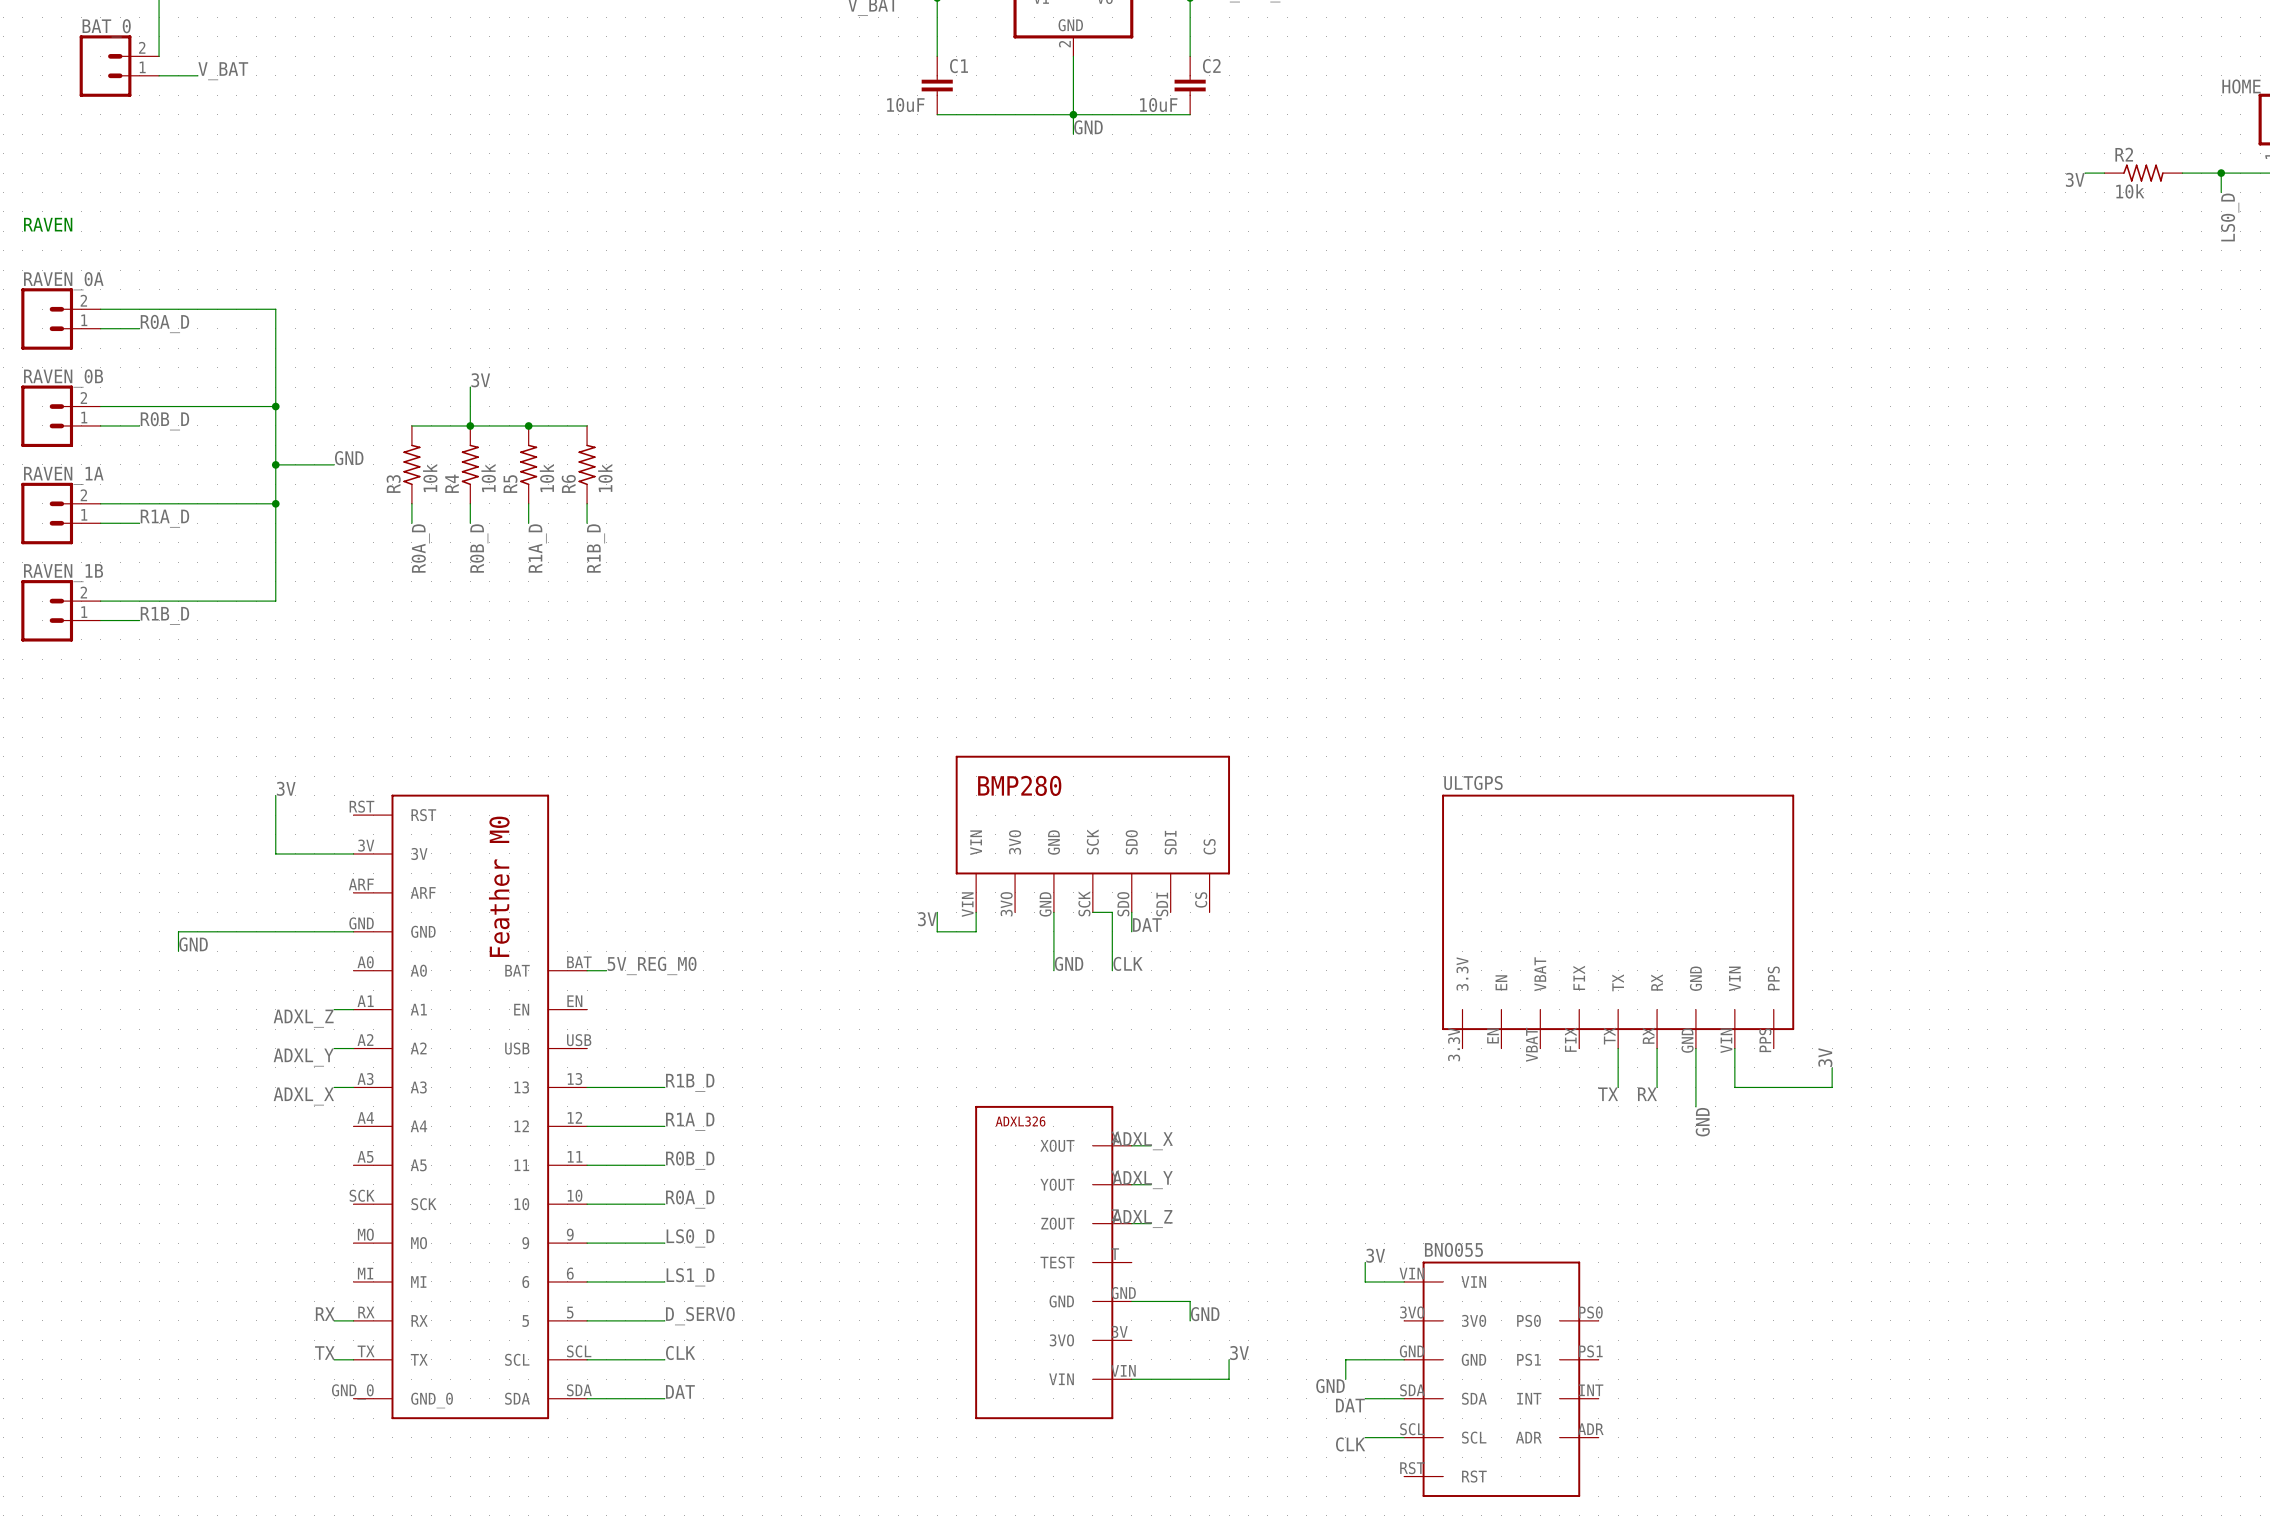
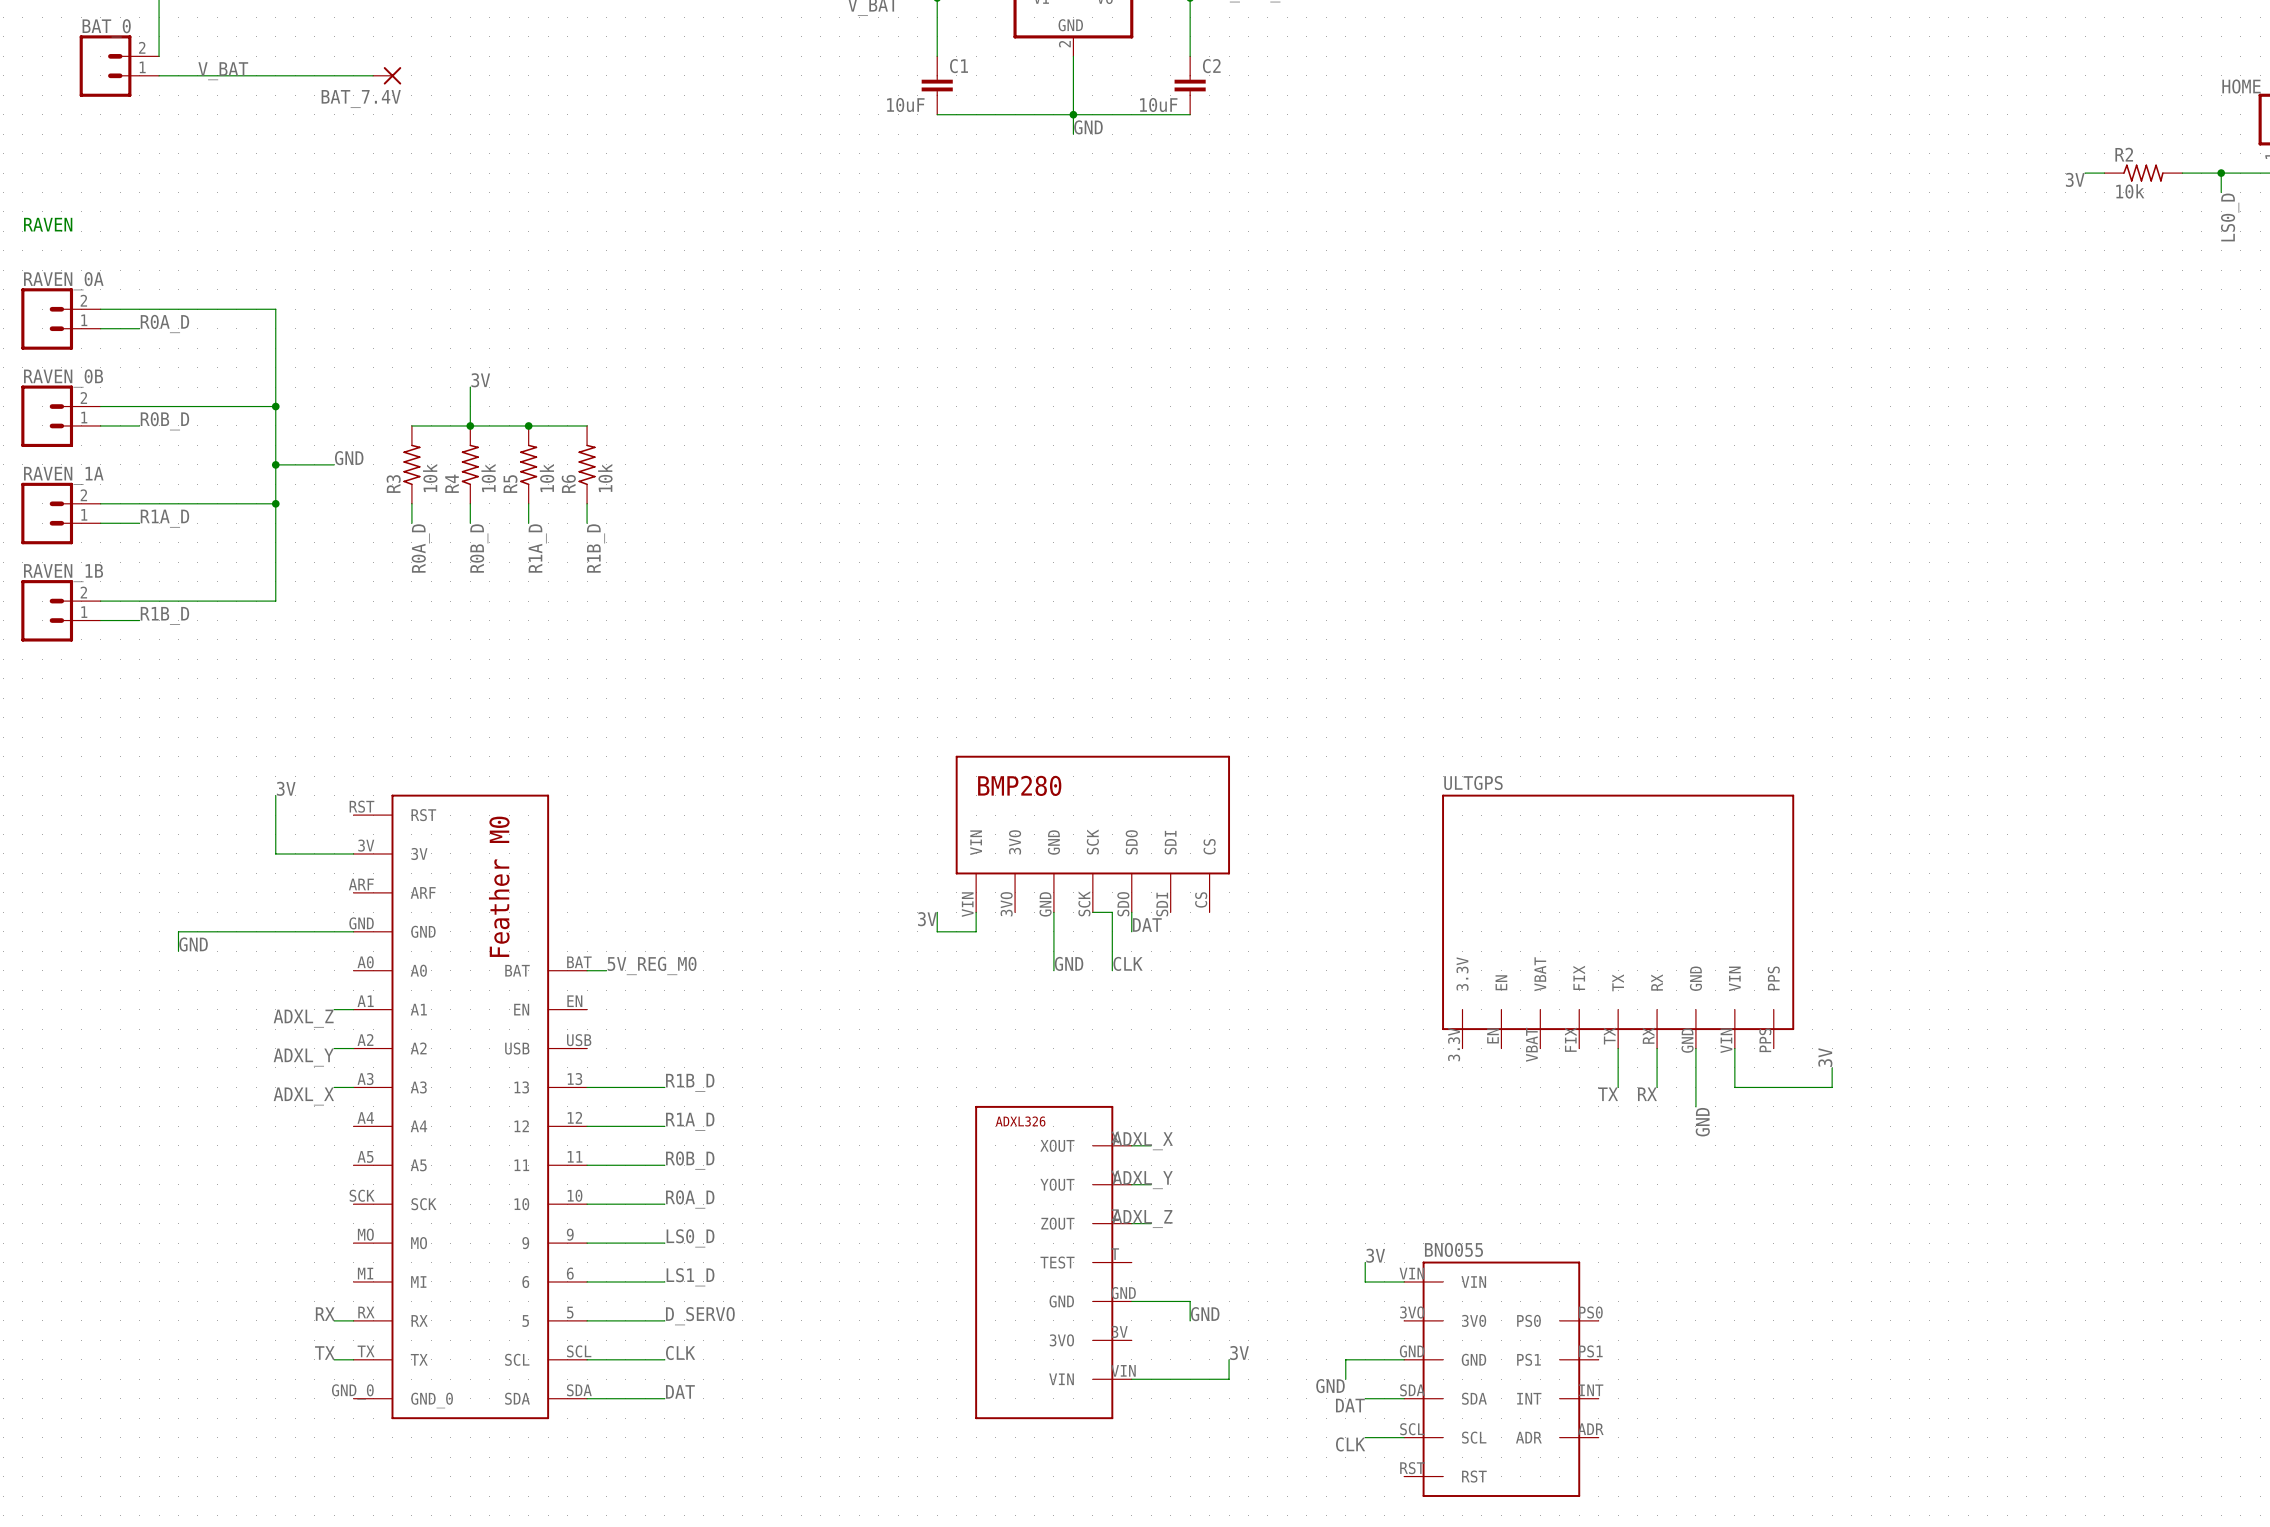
wire: none -> (197, 75) (373, 75)
BAT_7.4V: none -> (387, 75)

